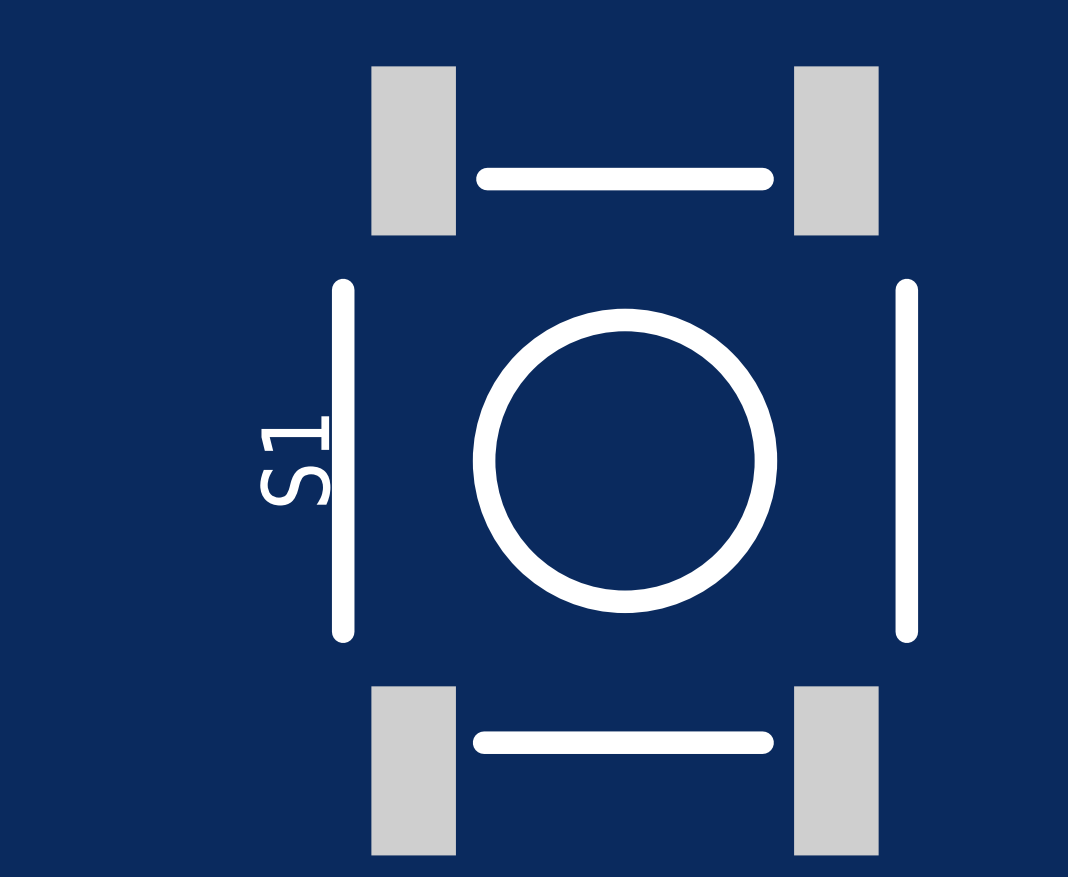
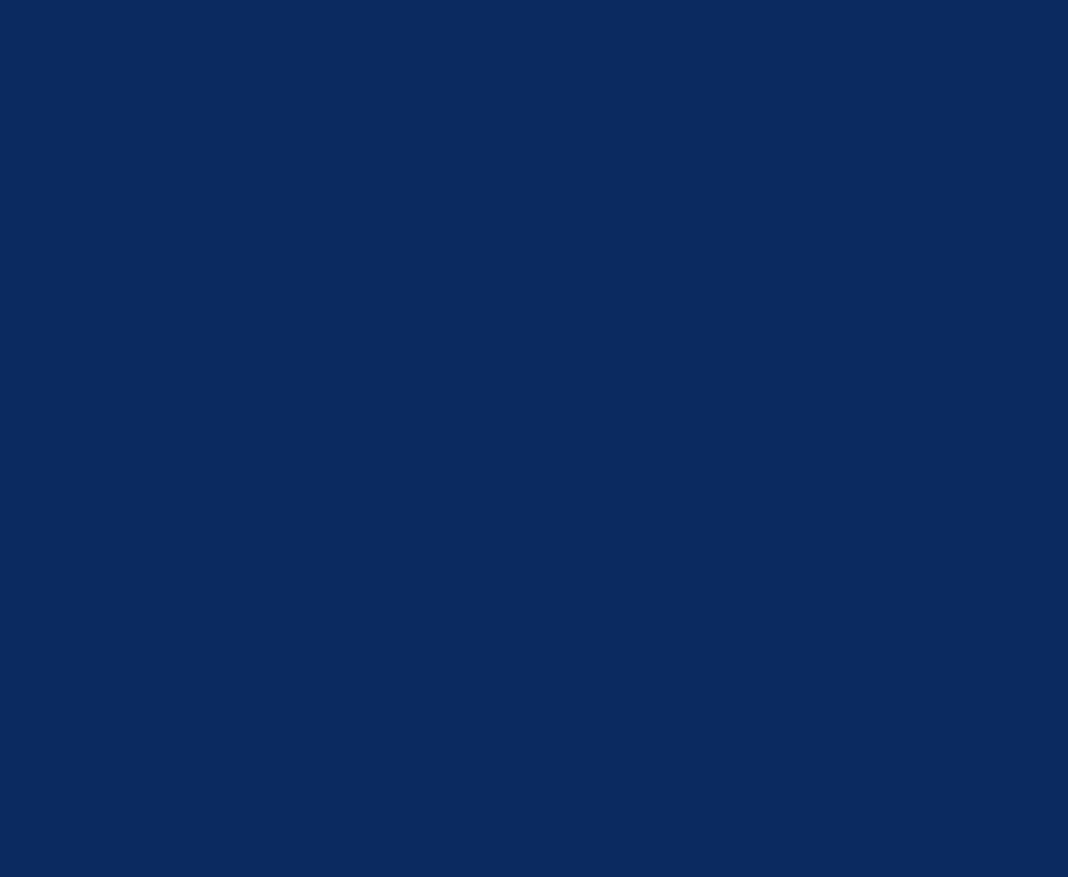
S1: (625, 460) -> none

